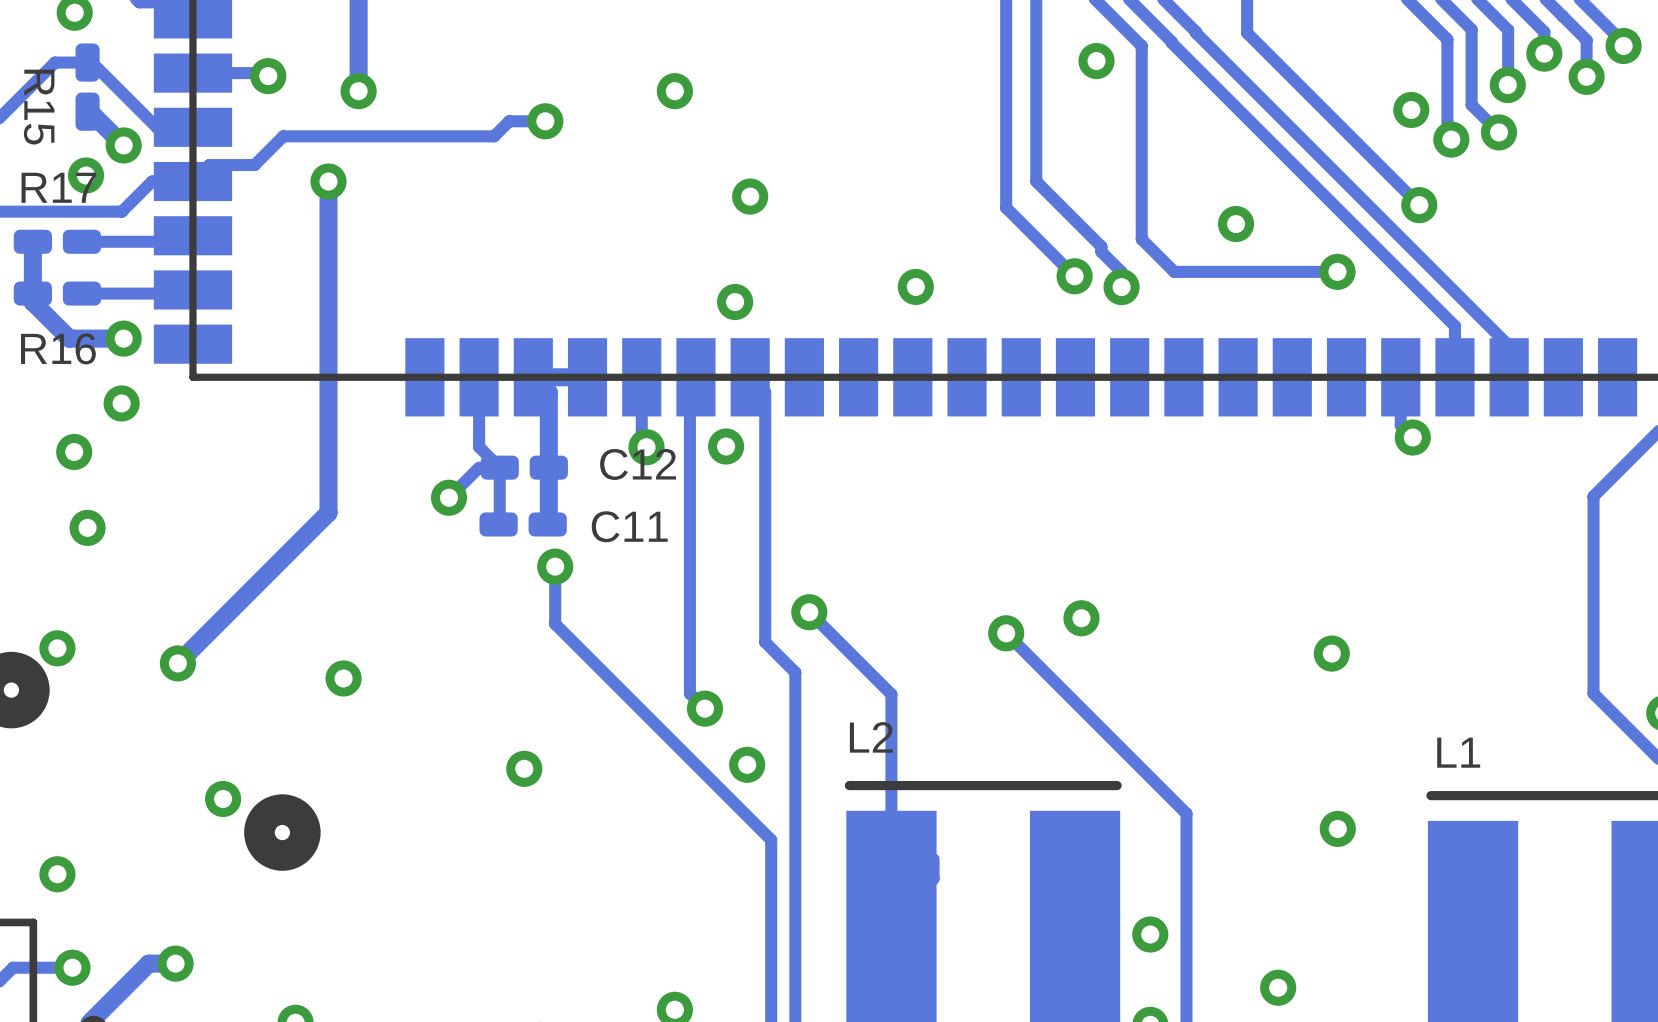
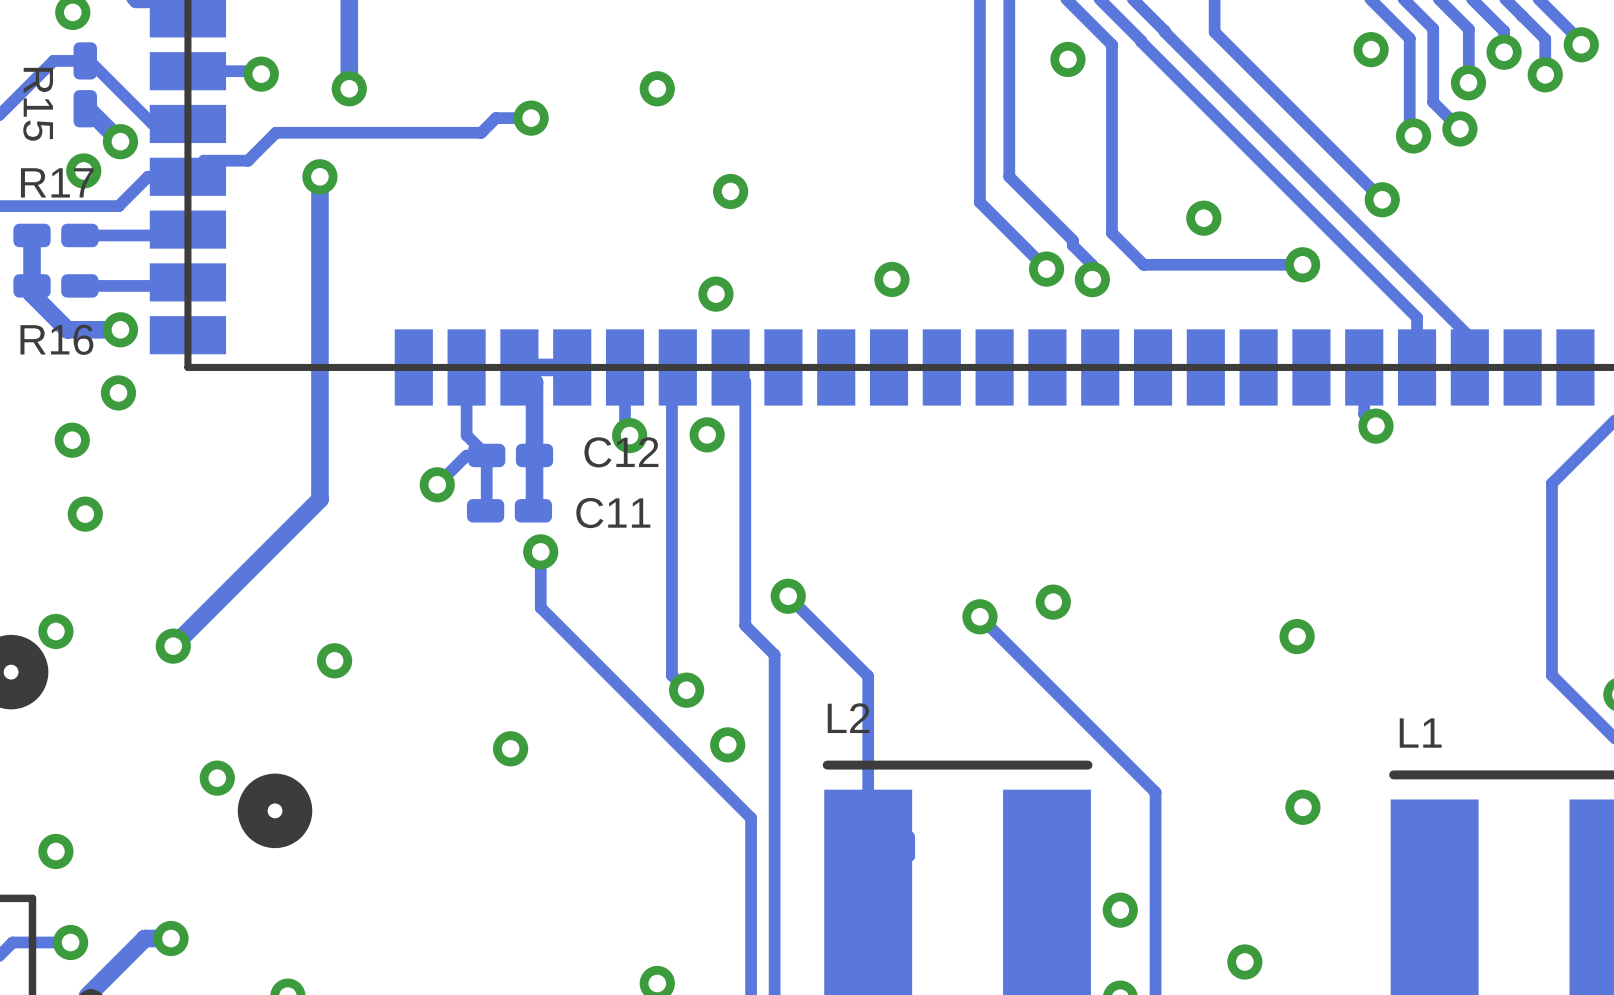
via position: (1411, 109) -> (1371, 49)

